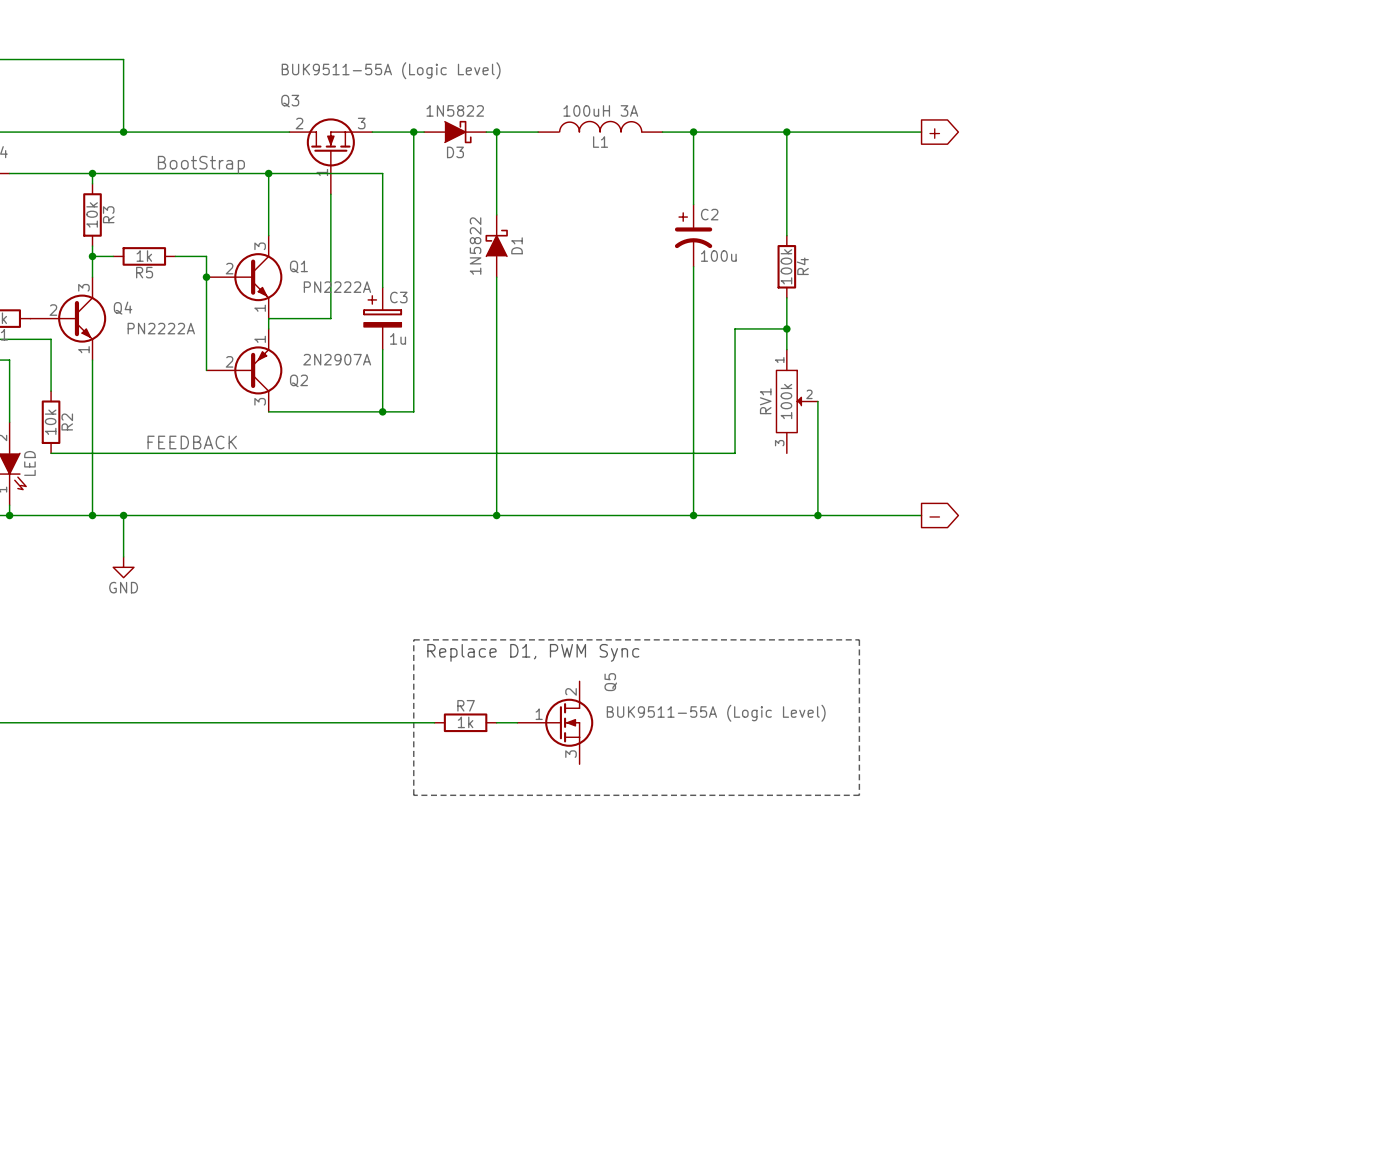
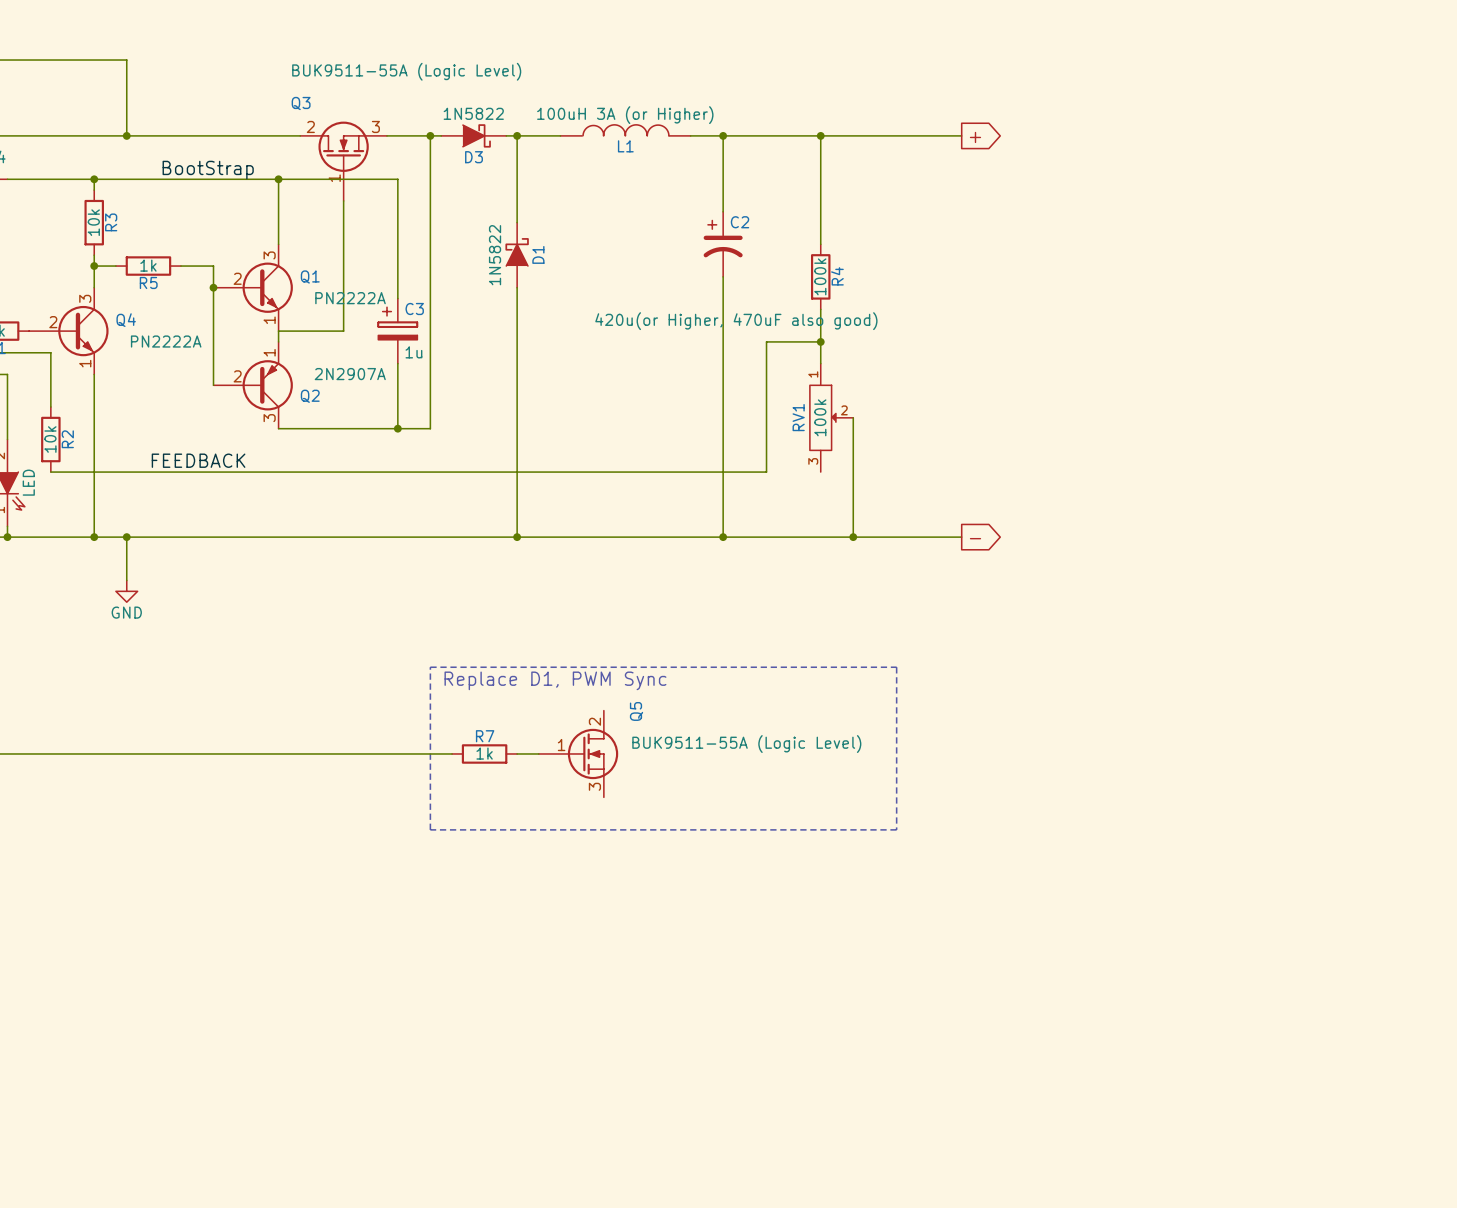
L1 value: 100uH 3A (600, 110) -> 100uH 3A (or Higher) (625, 115)
C2 value: 100u (718, 256) -> 420u(or Higher, 470uF also good) (736, 321)

